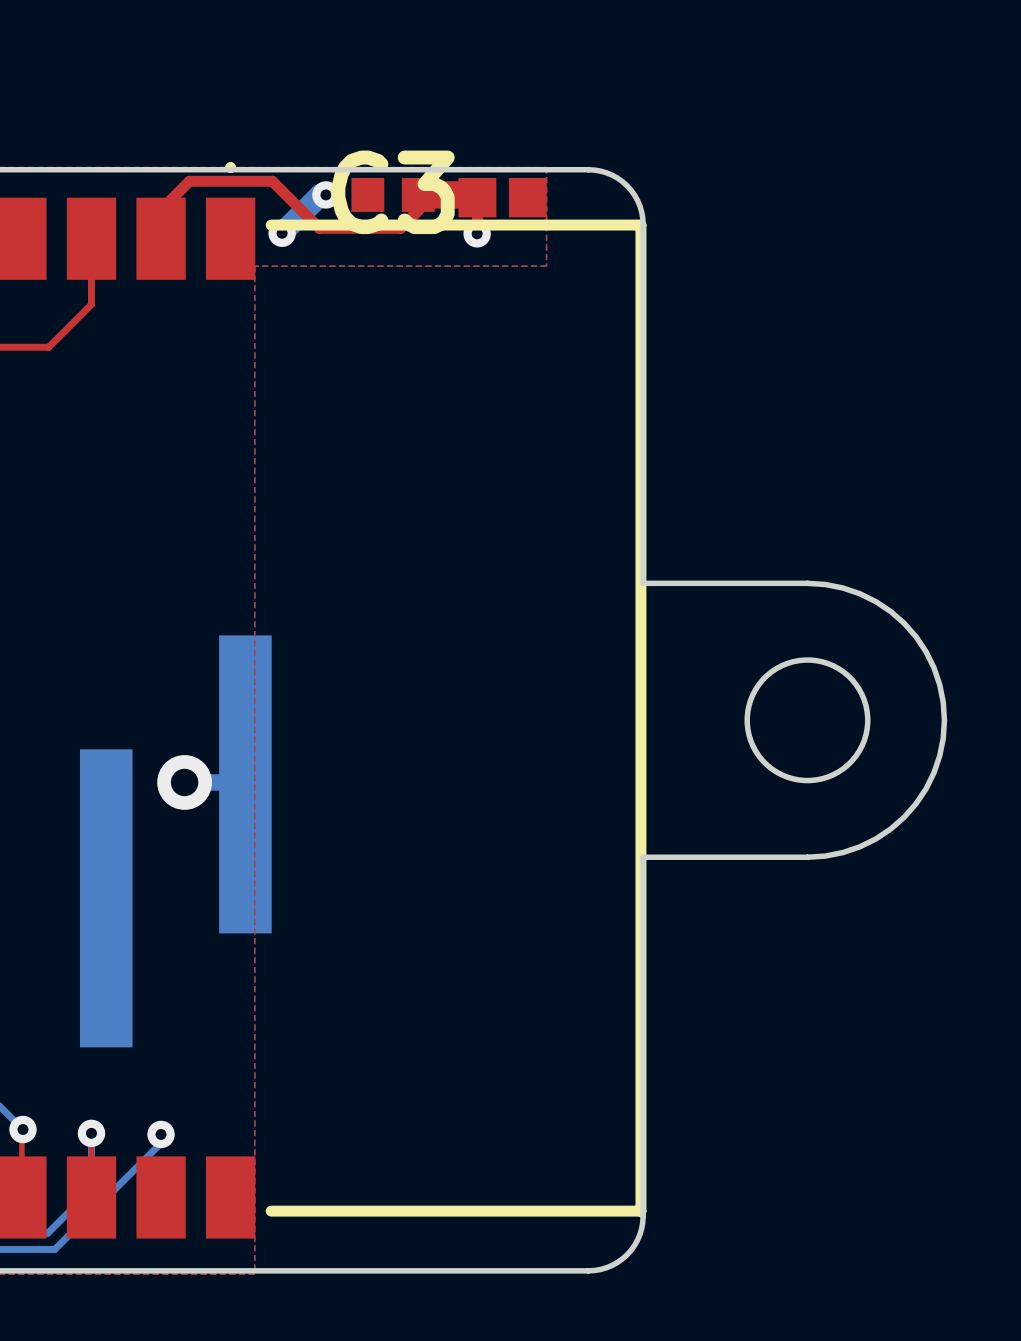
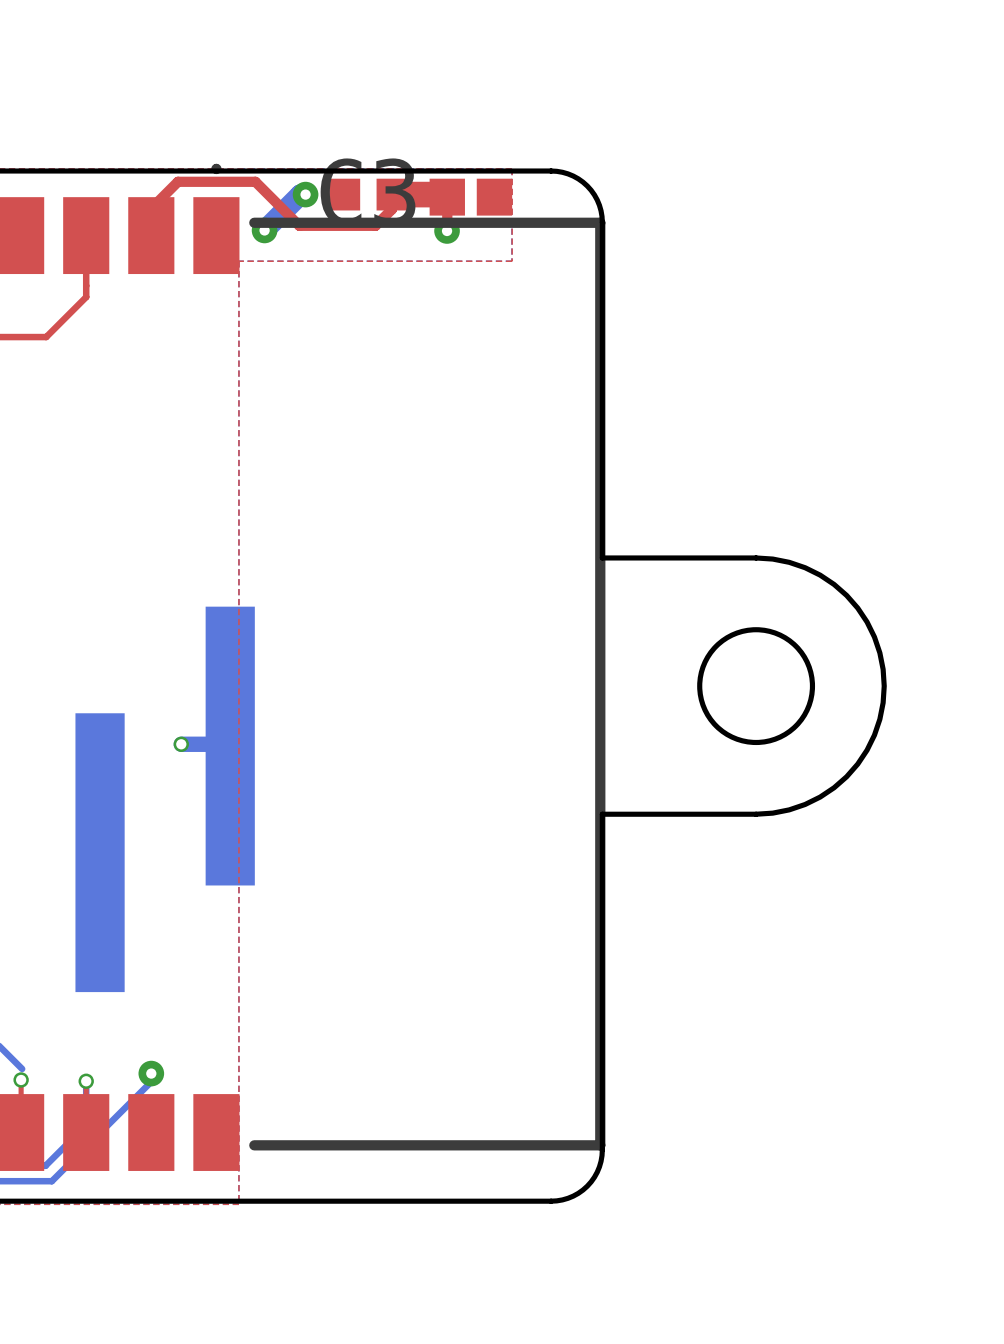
via size: [157, 755, 213, 810] -> [173, 736, 189, 752]
via size: [9, 1115, 37, 1144] -> [13, 1072, 29, 1088]
via size: [77, 1119, 106, 1148] -> [78, 1073, 94, 1089]

